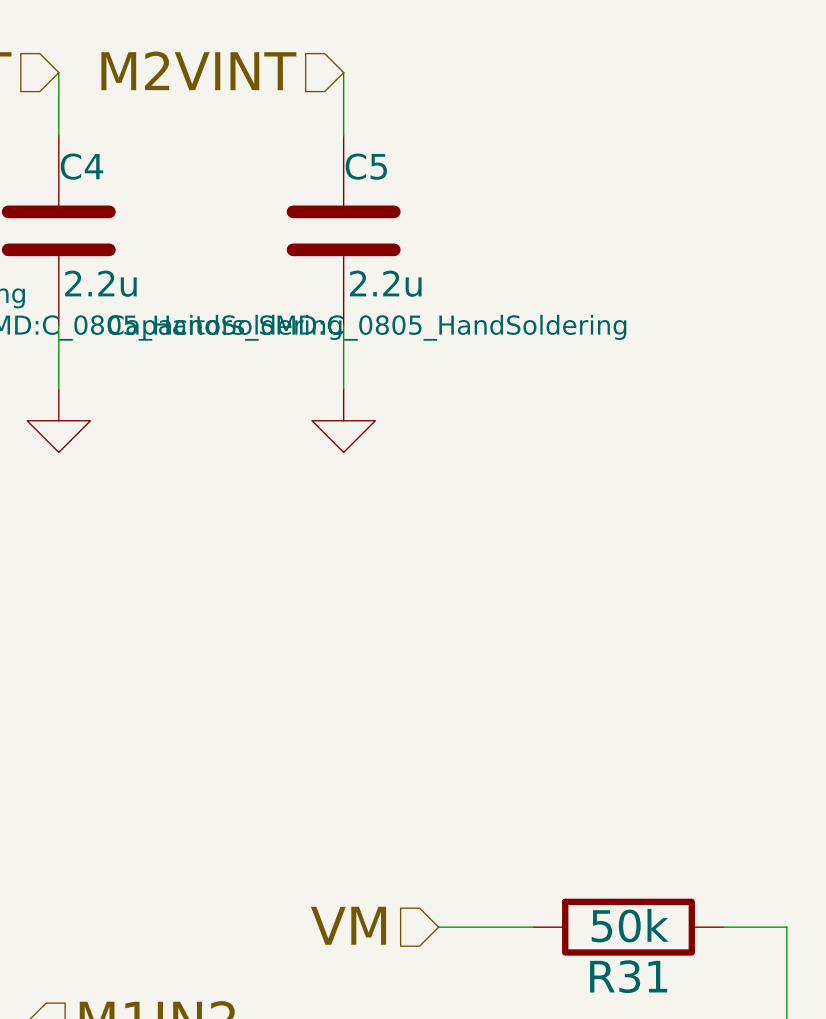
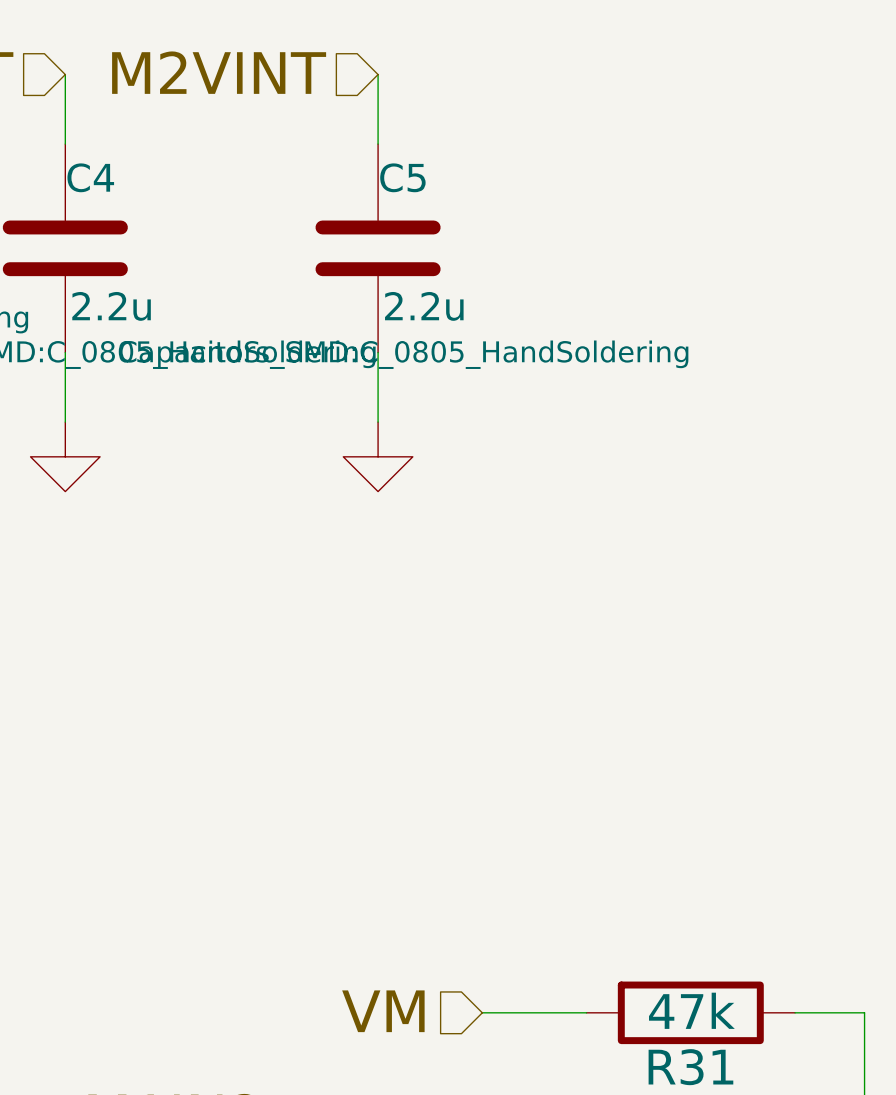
R31 value: 50k (630, 925) -> 47k (691, 1010)

